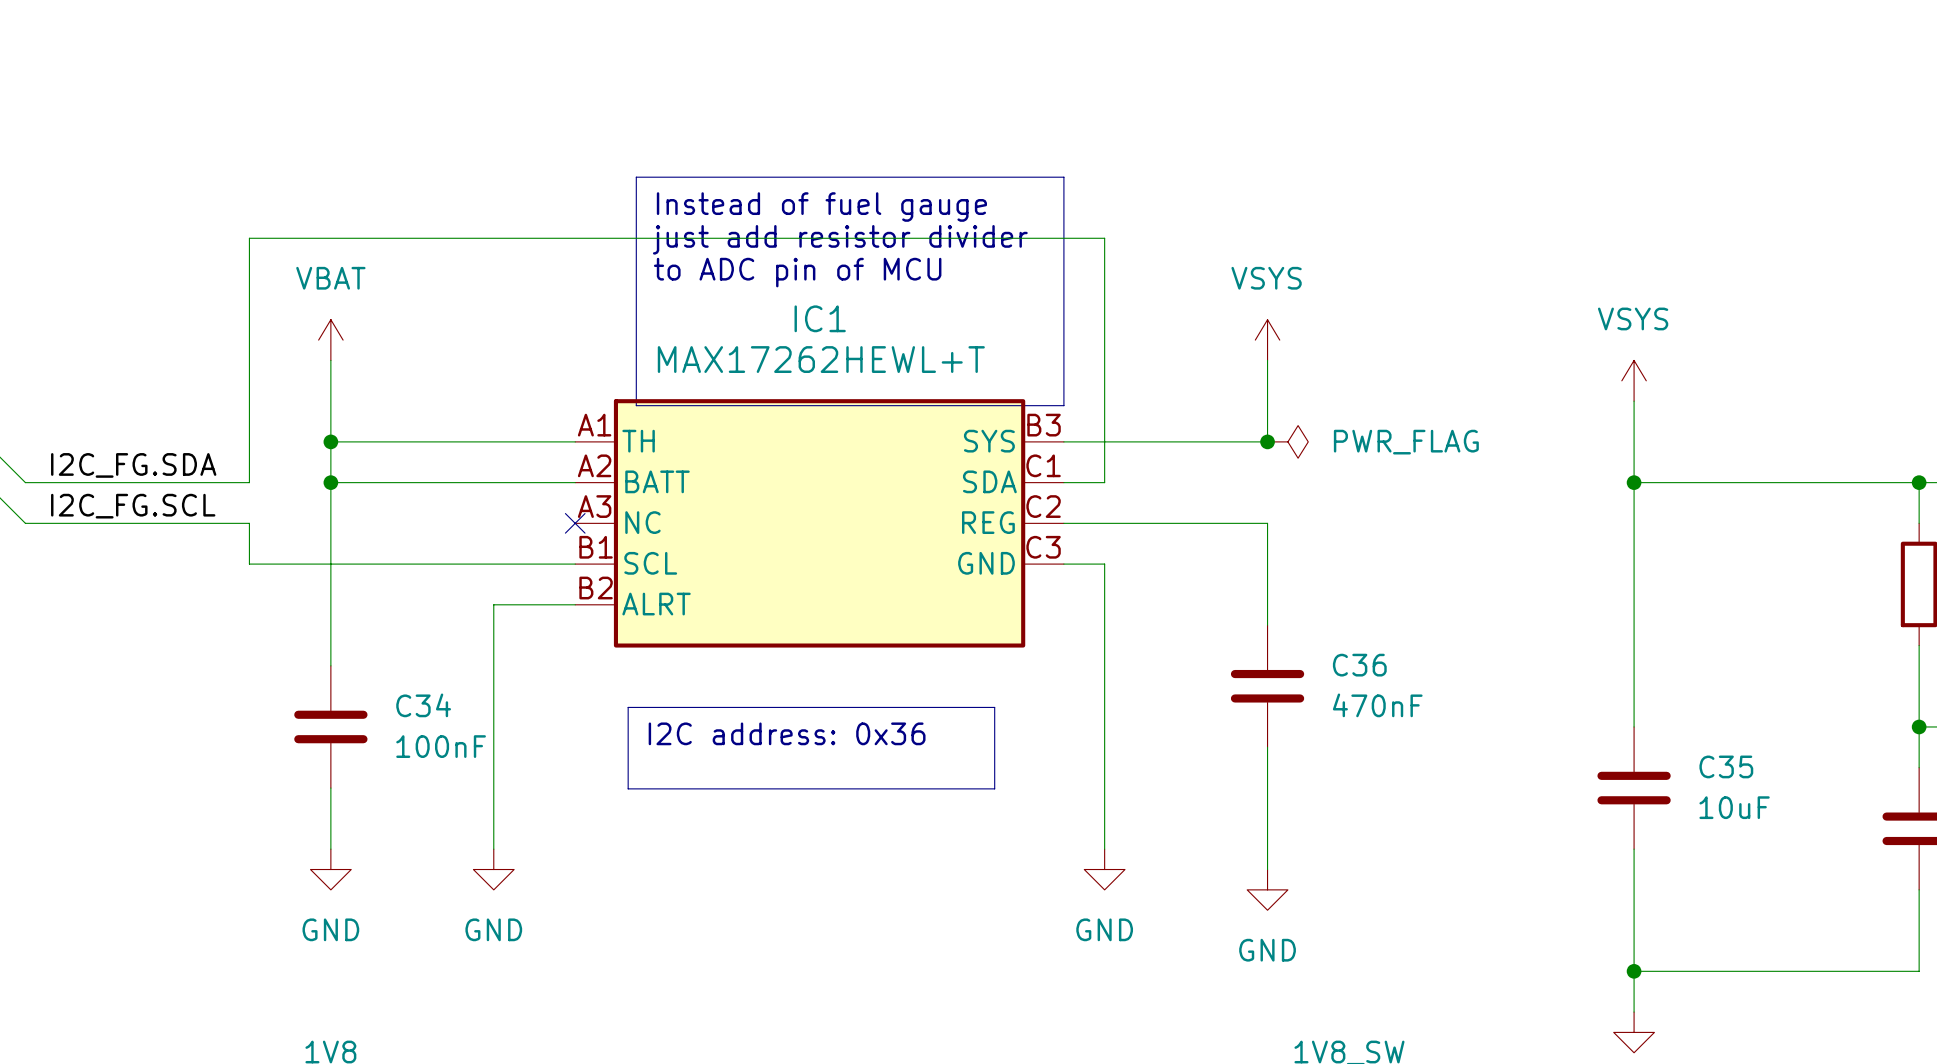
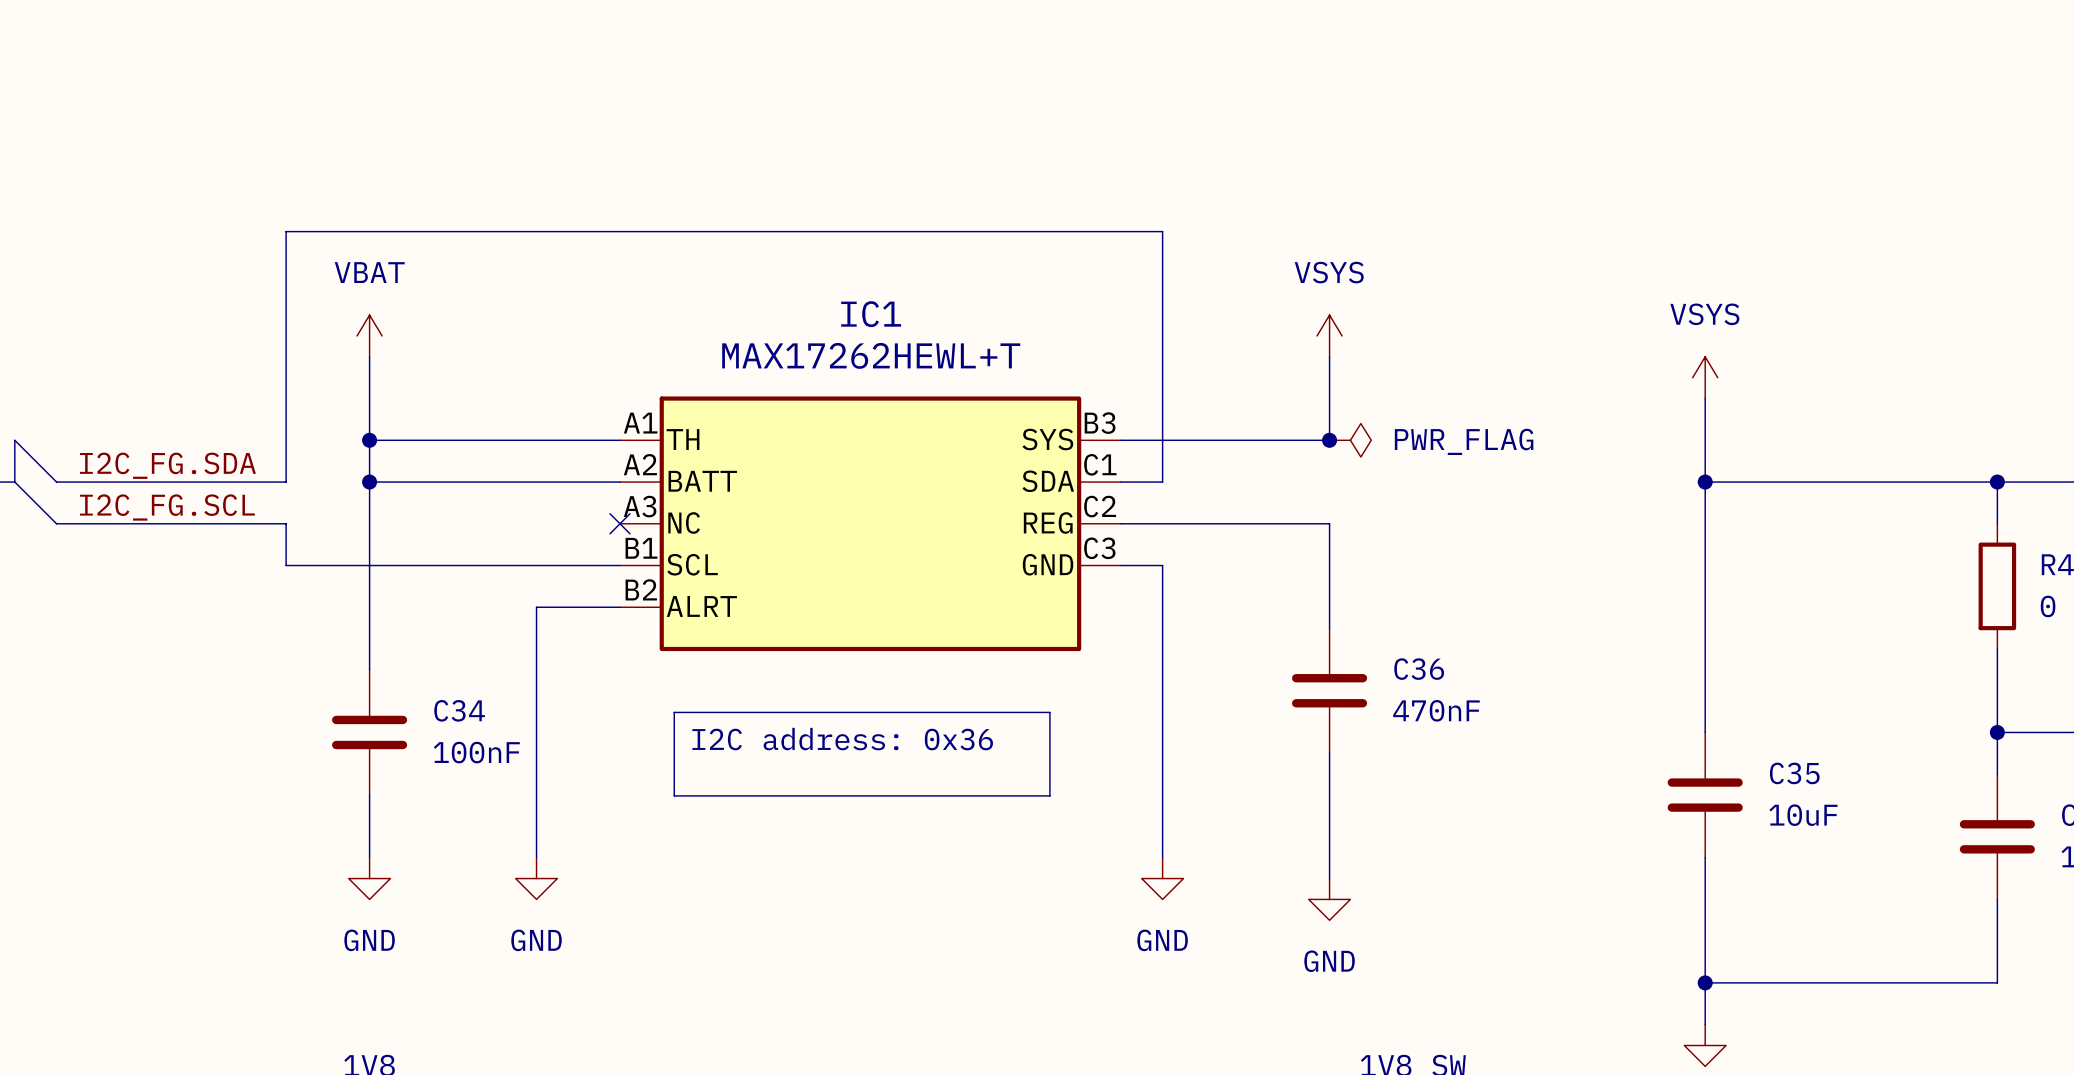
line: (636, 177) (1063, 177) (1063, 405) (636, 405) (636, 177) -> none
text: Instead of fuel gauge (821, 207) -> none
text: just add resistor divider (840, 239) -> none
text: to ADC pin of MCU (797, 272) -> none

